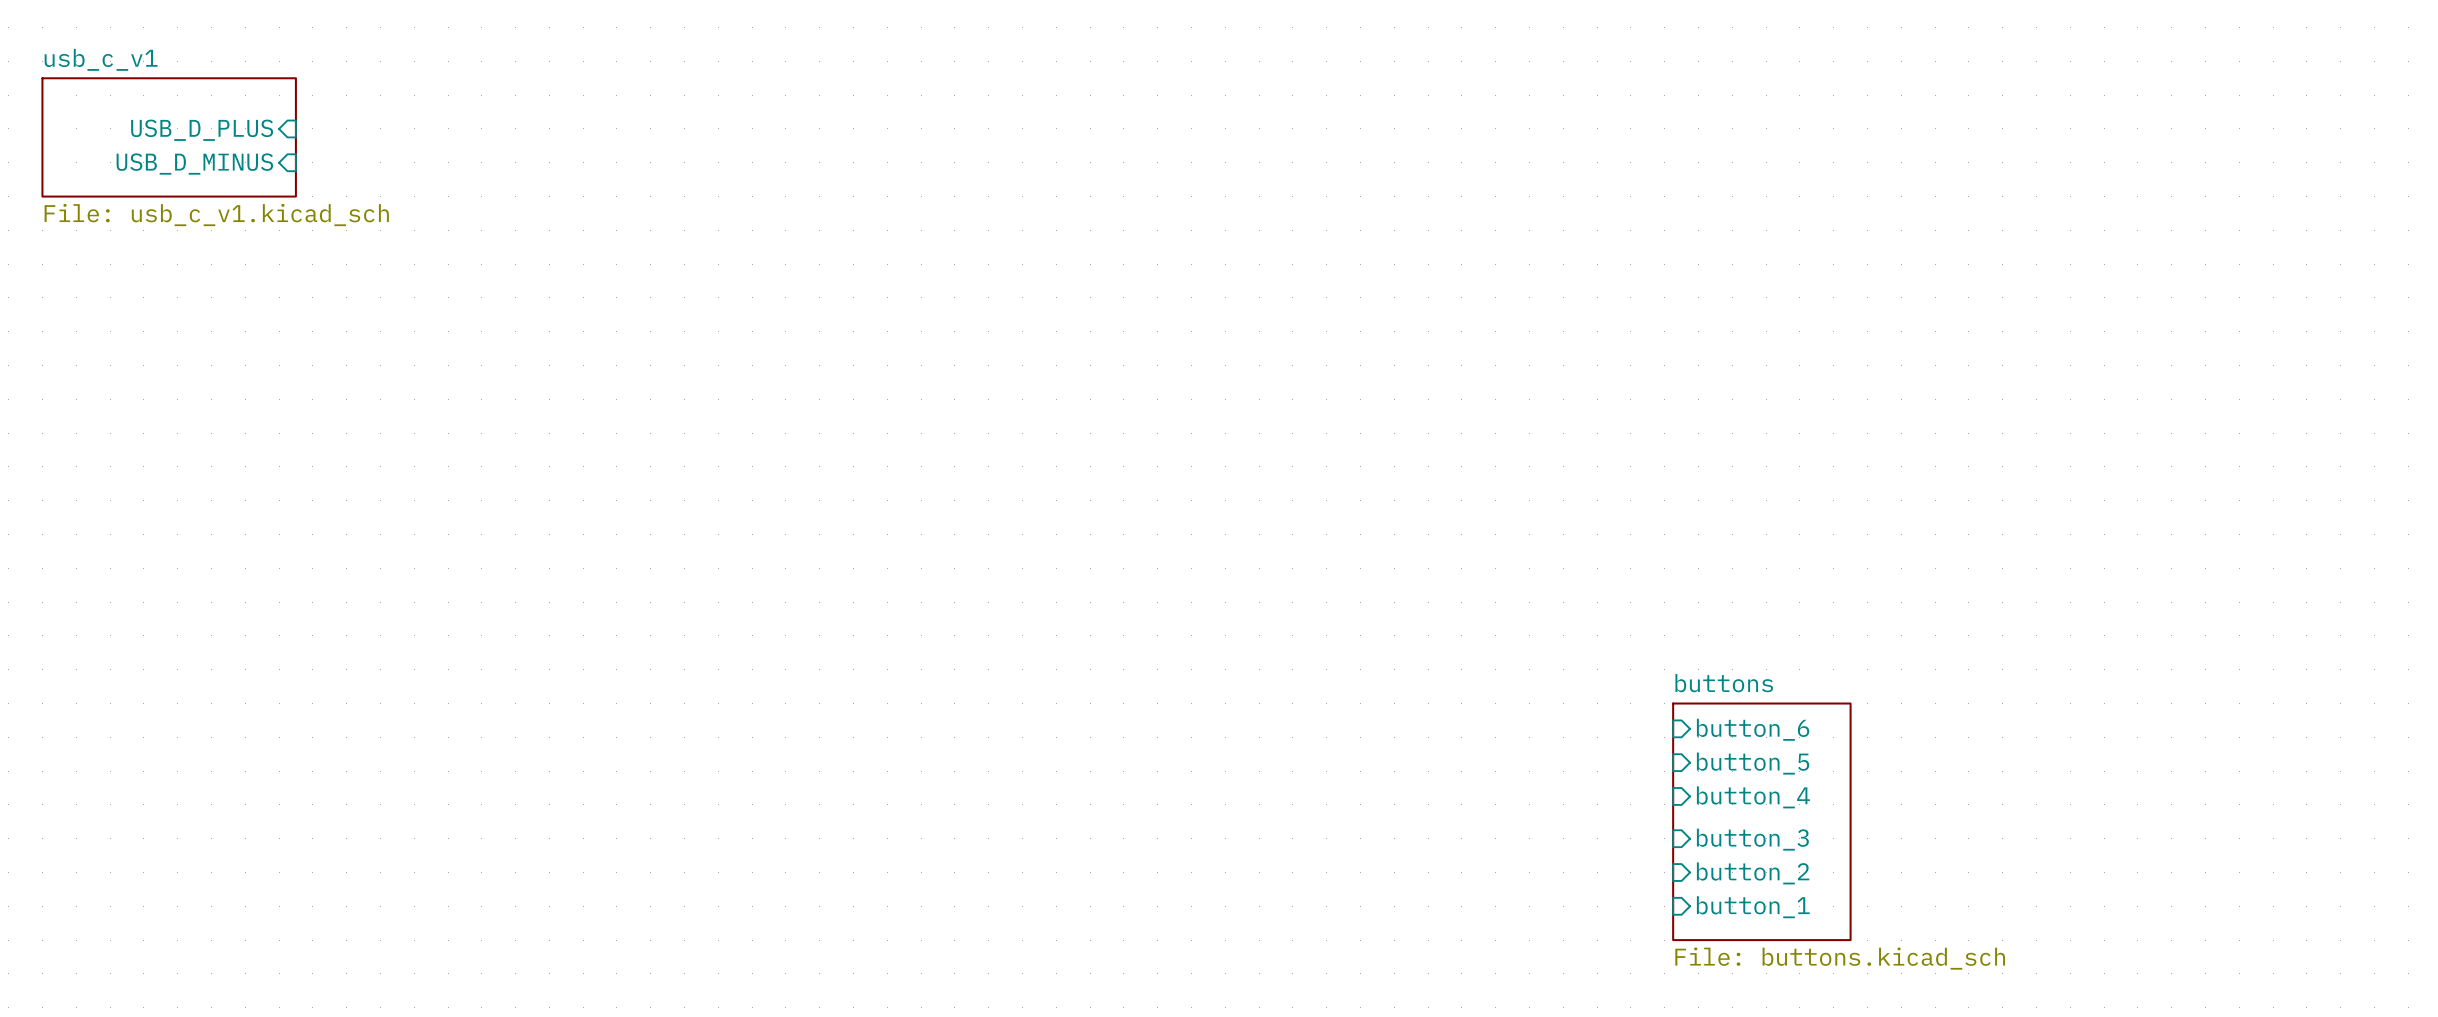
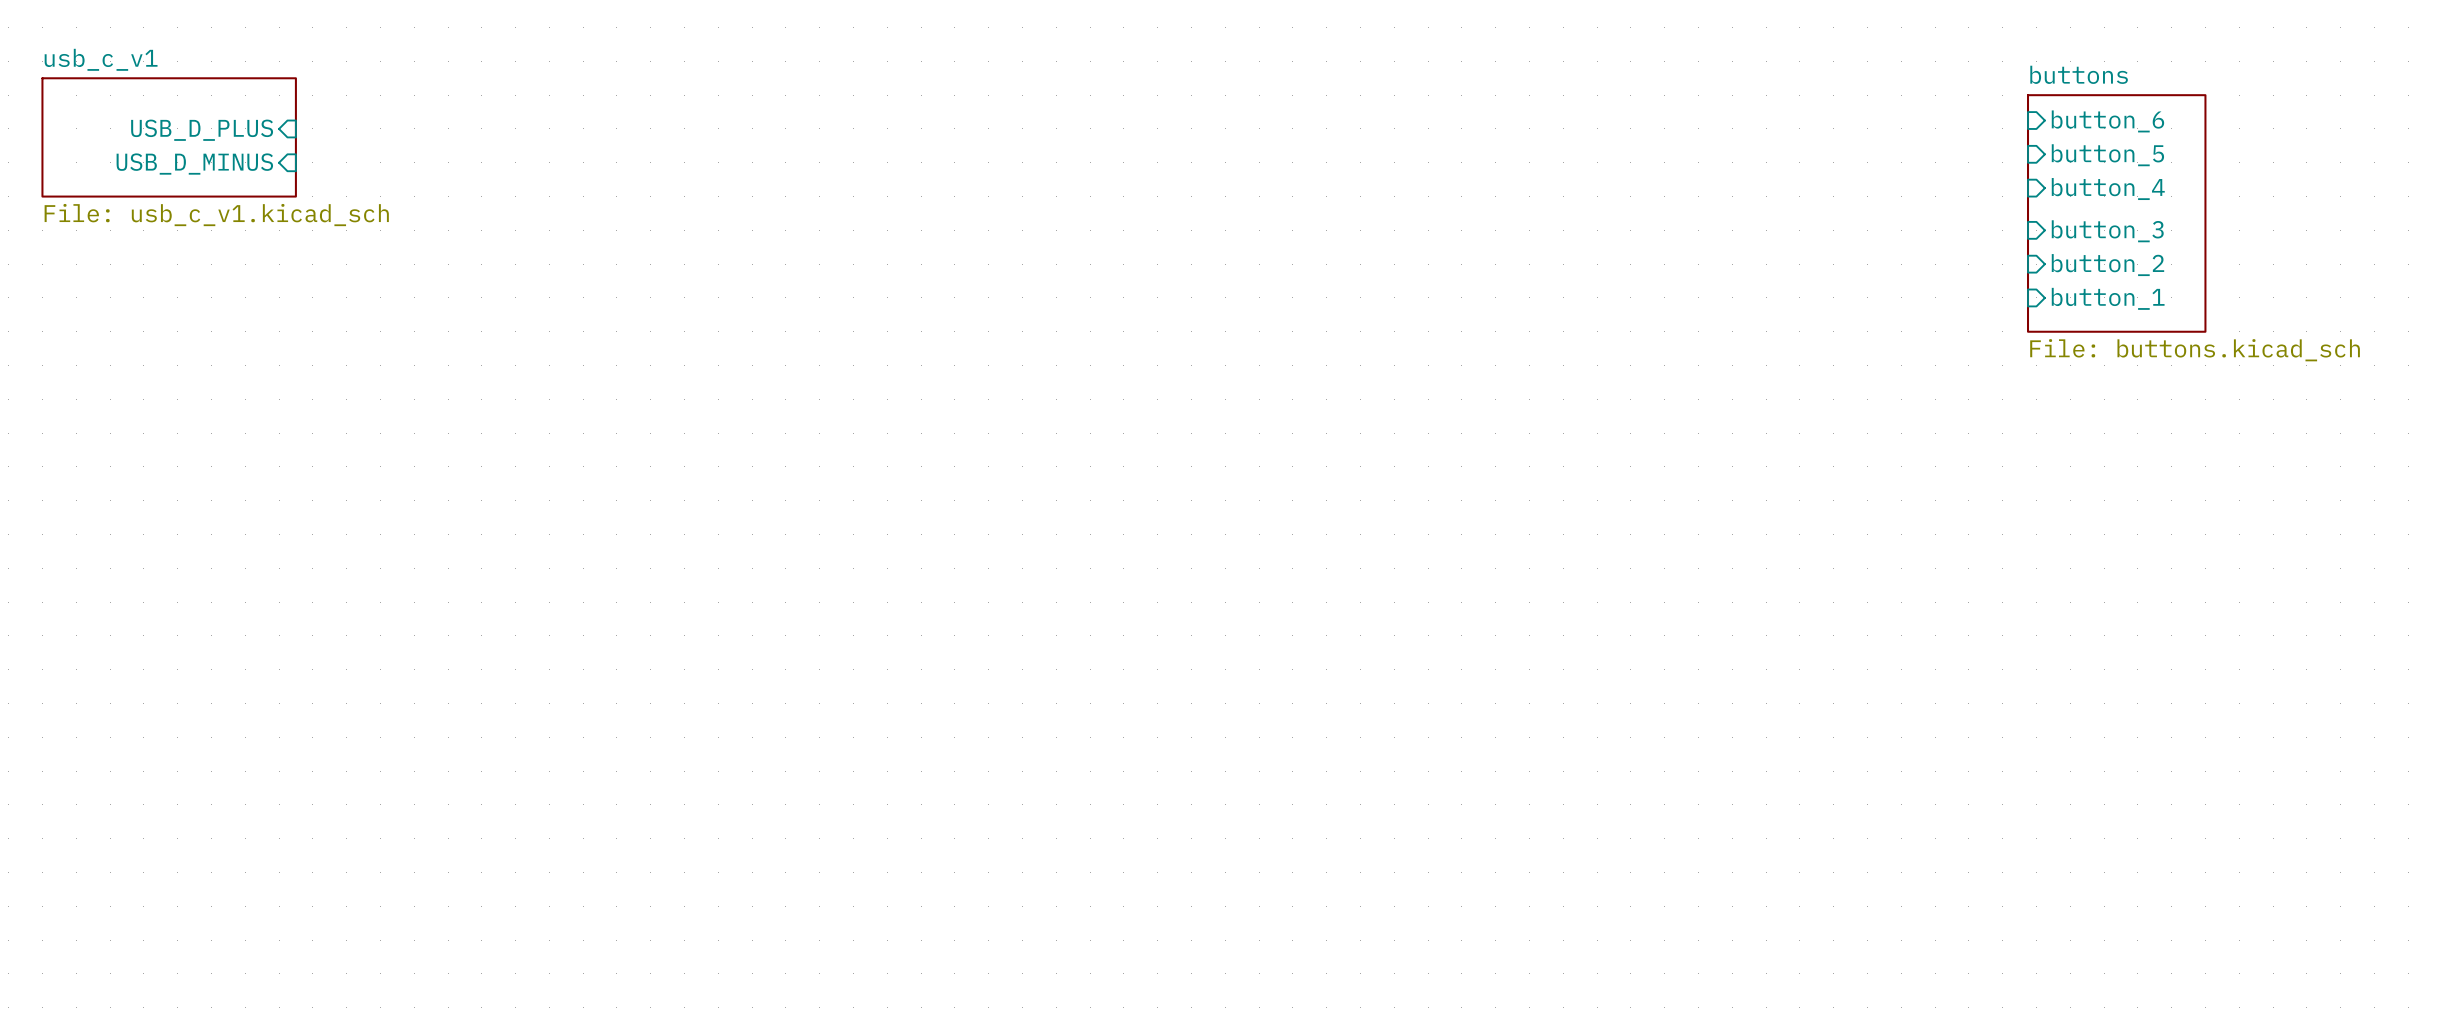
sheet pin: none -> button_6 (2107, 121)
sheet pin: none -> button_5 (2107, 155)
sheet pin: none -> button_4 (2108, 189)
sheet buttons: none -> File: buttons.kicad_sch (2116, 213)
sheet pin: none -> button_3 (2107, 231)
sheet pin: none -> button_2 (2107, 265)
sheet pin: none -> button_1 (2108, 298)
sheet pin: button_6 (1753, 729) -> none
sheet pin: button_5 (1753, 763) -> none
sheet pin: button_4 (1753, 797) -> none
sheet buttons: File: buttons.kicad_sch (1761, 821) -> none
sheet pin: button_3 (1752, 839) -> none
sheet pin: button_2 (1753, 873) -> none
sheet pin: button_1 (1753, 907) -> none

